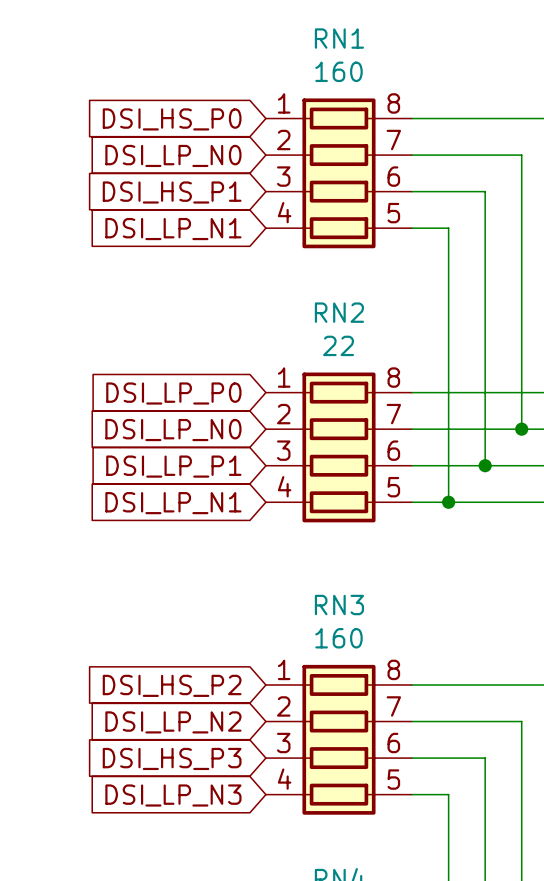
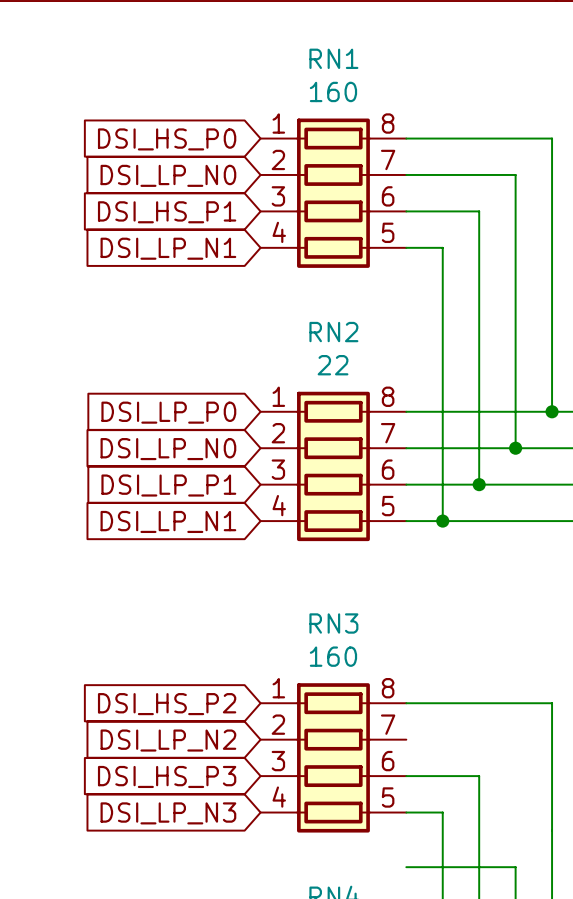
wire: (412, 721) (521, 721) (521, 849) -> (406, 867) (515, 867)

